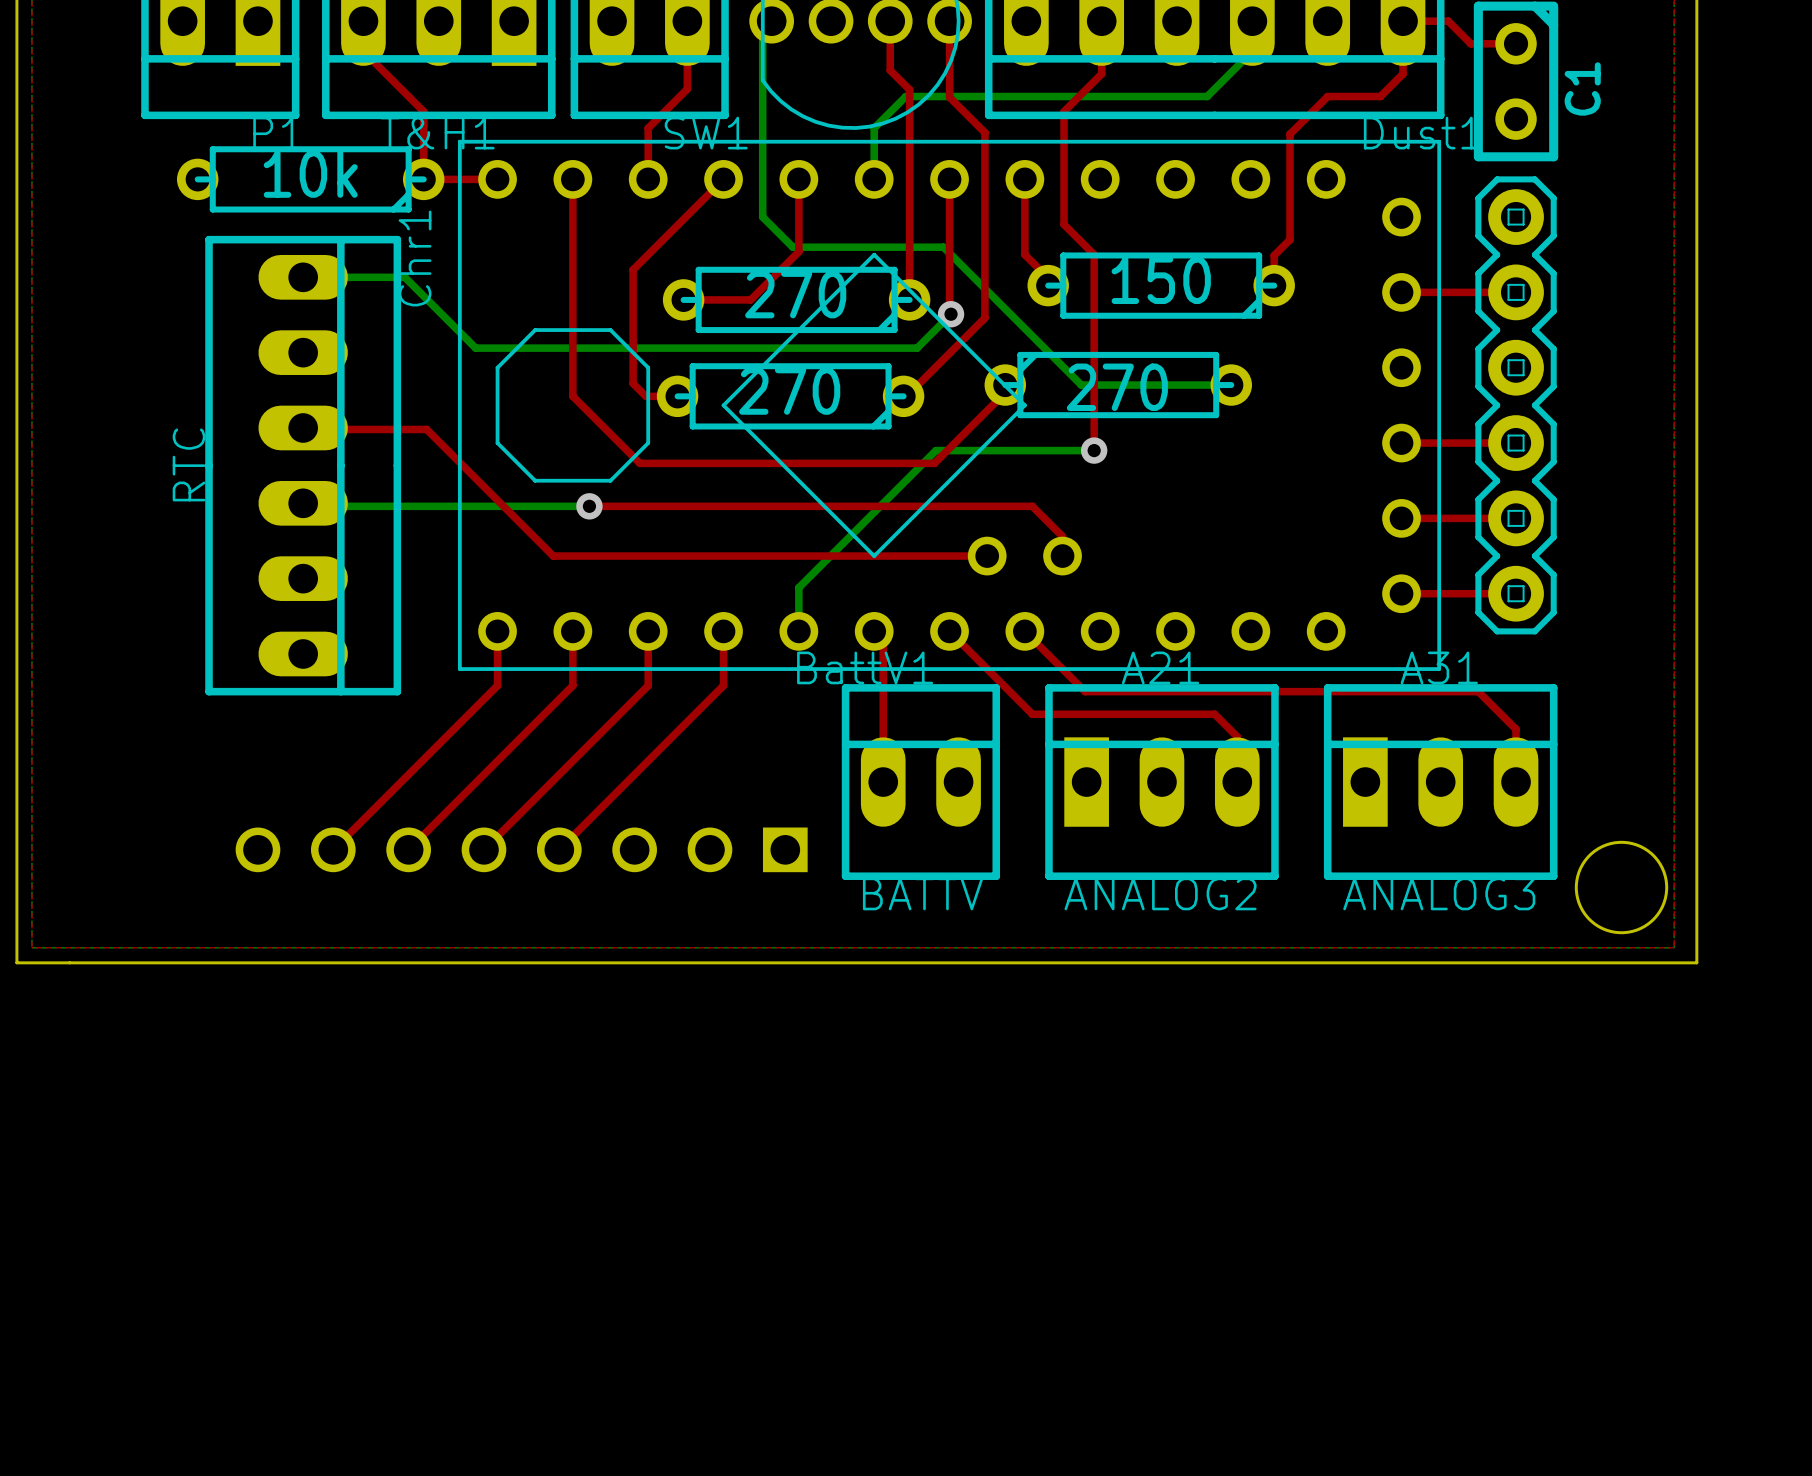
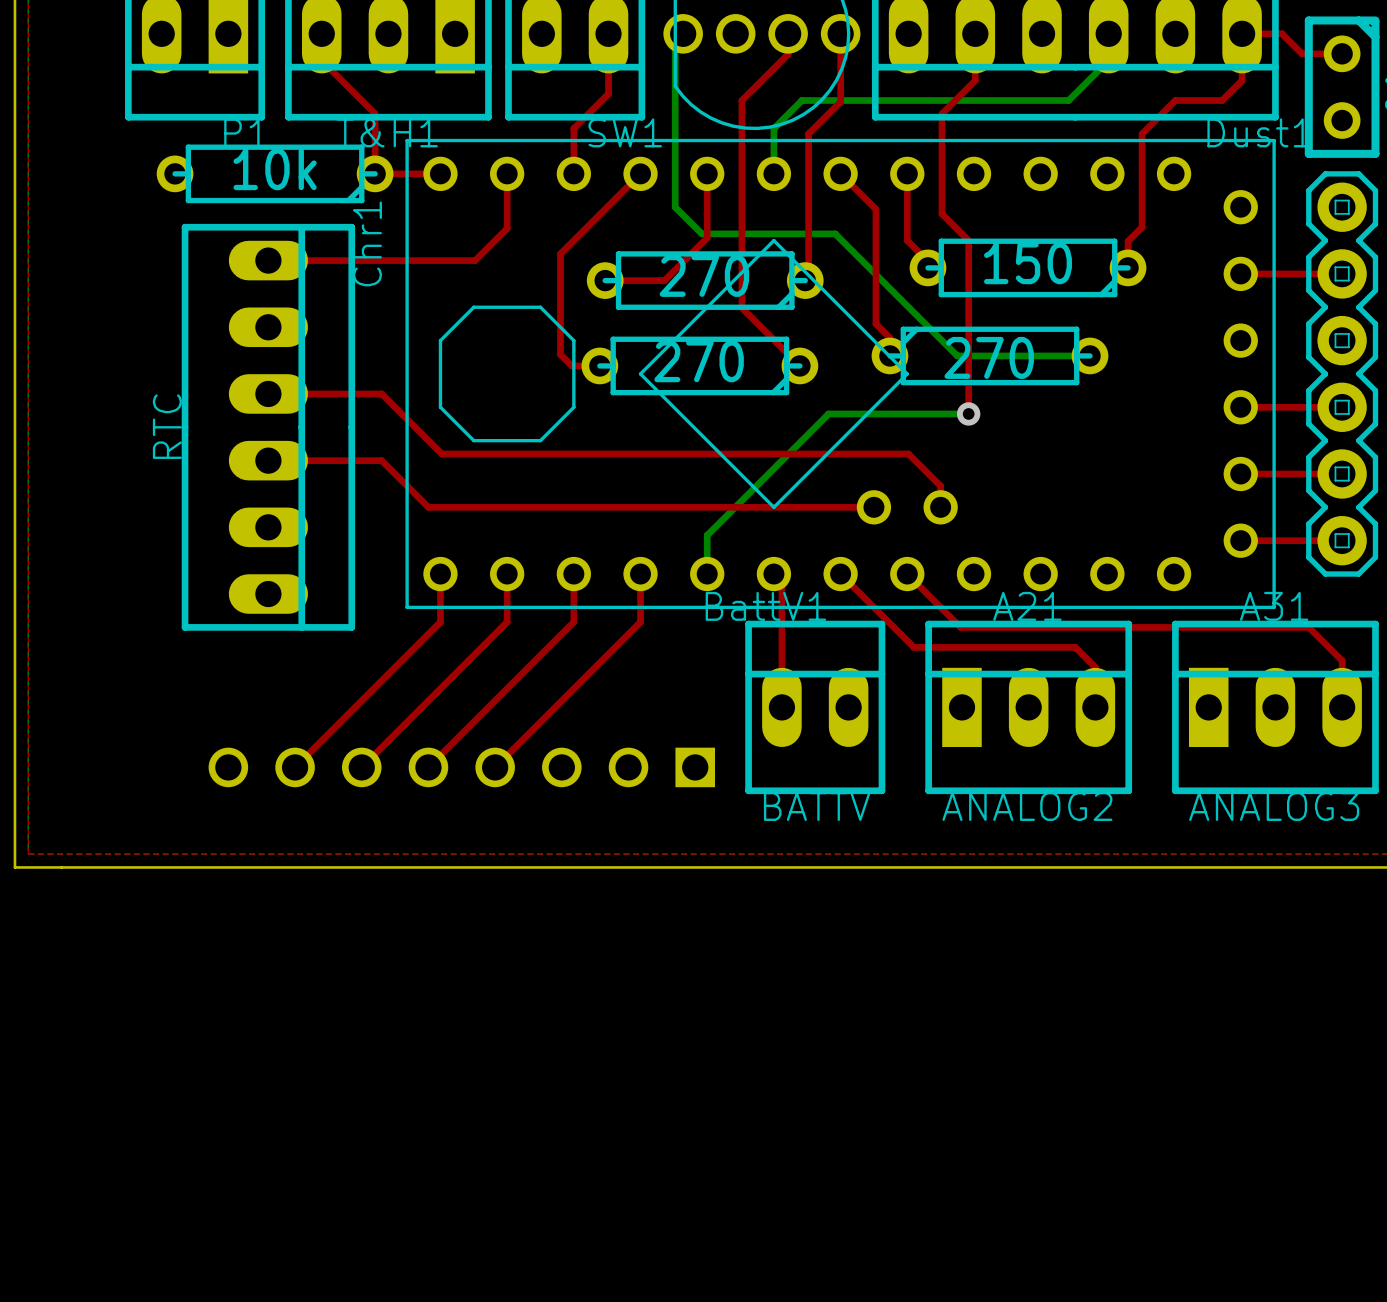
top track: (890, 44) (890, 70) (909, 89) (909, 299) -> (840, 101) (808, 133) (808, 277) (805, 280)
top track: (949, 97) (984, 132) (984, 318) (906, 396) (903, 396) -> (788, 54) (741, 100) (741, 307) (799, 365)
top track: (949, 179) (949, 314) (951, 314) -> (840, 173) (875, 209) (875, 323) (889, 337) (889, 355)
top track: (572, 241) (572, 396) (639, 463) (934, 463) (1005, 392) (1005, 385) -> (507, 228) (475, 260) (268, 260)
bottom track: (303, 277) (404, 277) (475, 348) (917, 348) (951, 314) -> none
via: (951, 314) -> none
top track: (303, 427) (426, 429) (553, 556) -> (268, 460) (381, 460) (428, 507) (489, 507)
bottom track: (303, 503) (306, 506) (588, 505) -> none
top track: (589, 506) (1032, 506) (1062, 536) -> (268, 393) (381, 393) (441, 453) (908, 453) (940, 485) (940, 489)
via: (589, 506) -> none

